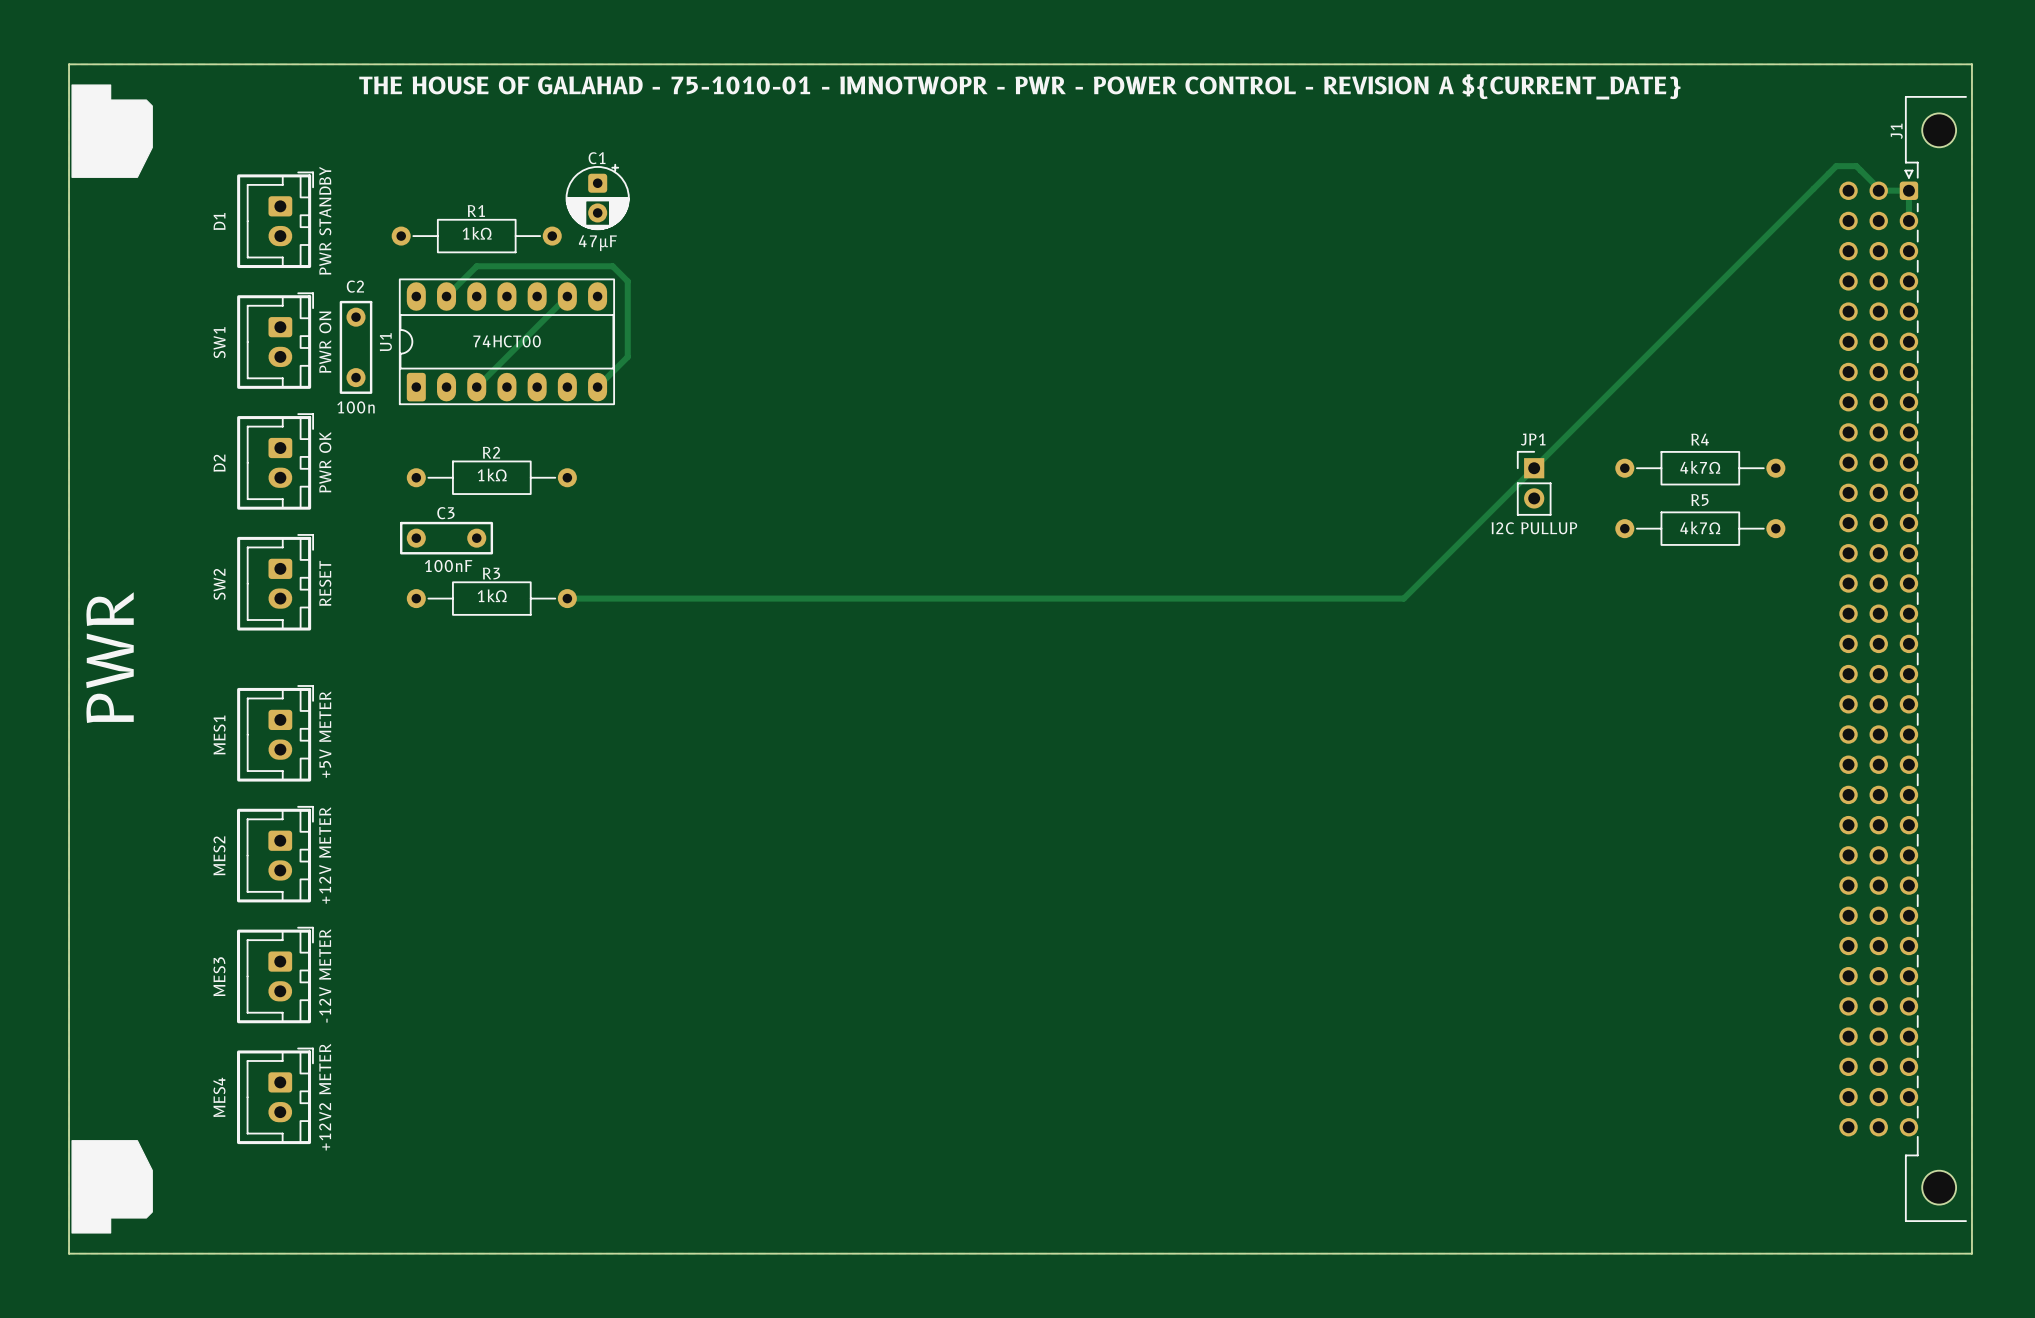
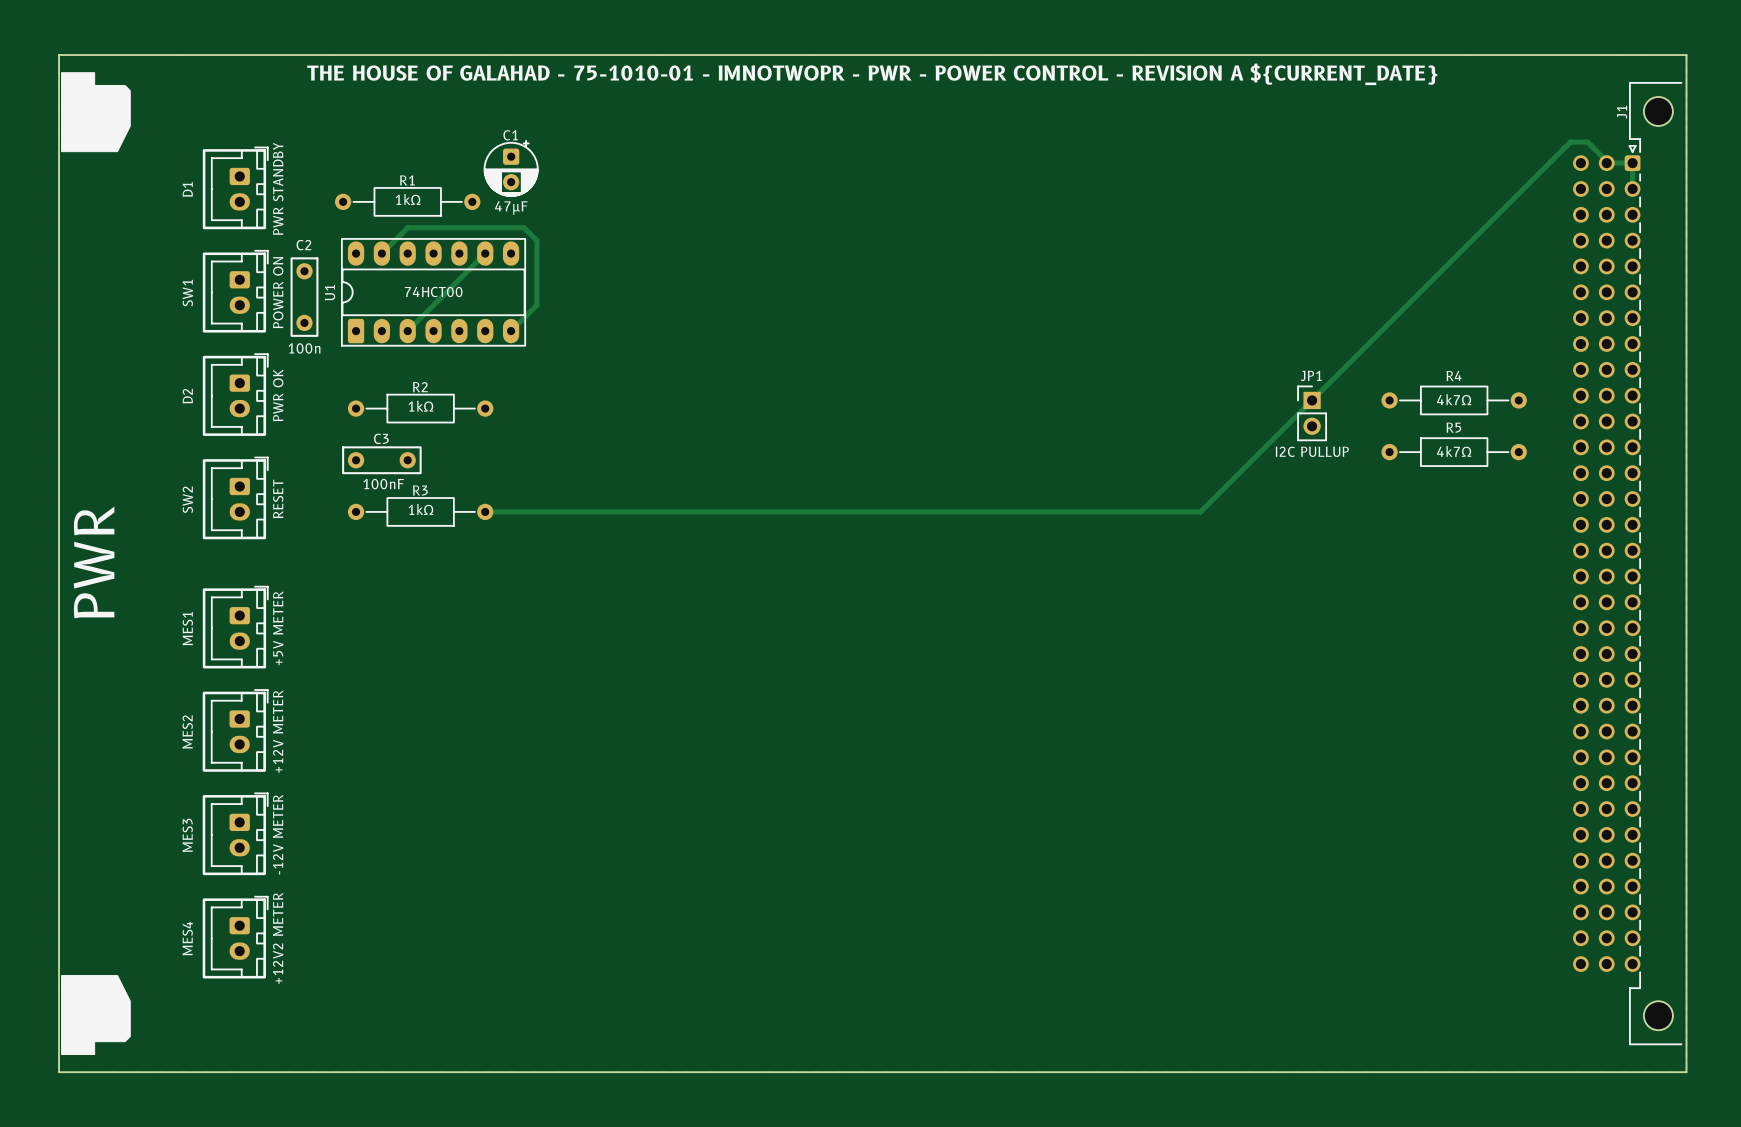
SW1 value: PWR ON (325, 342) -> POWER ON (278, 292)

